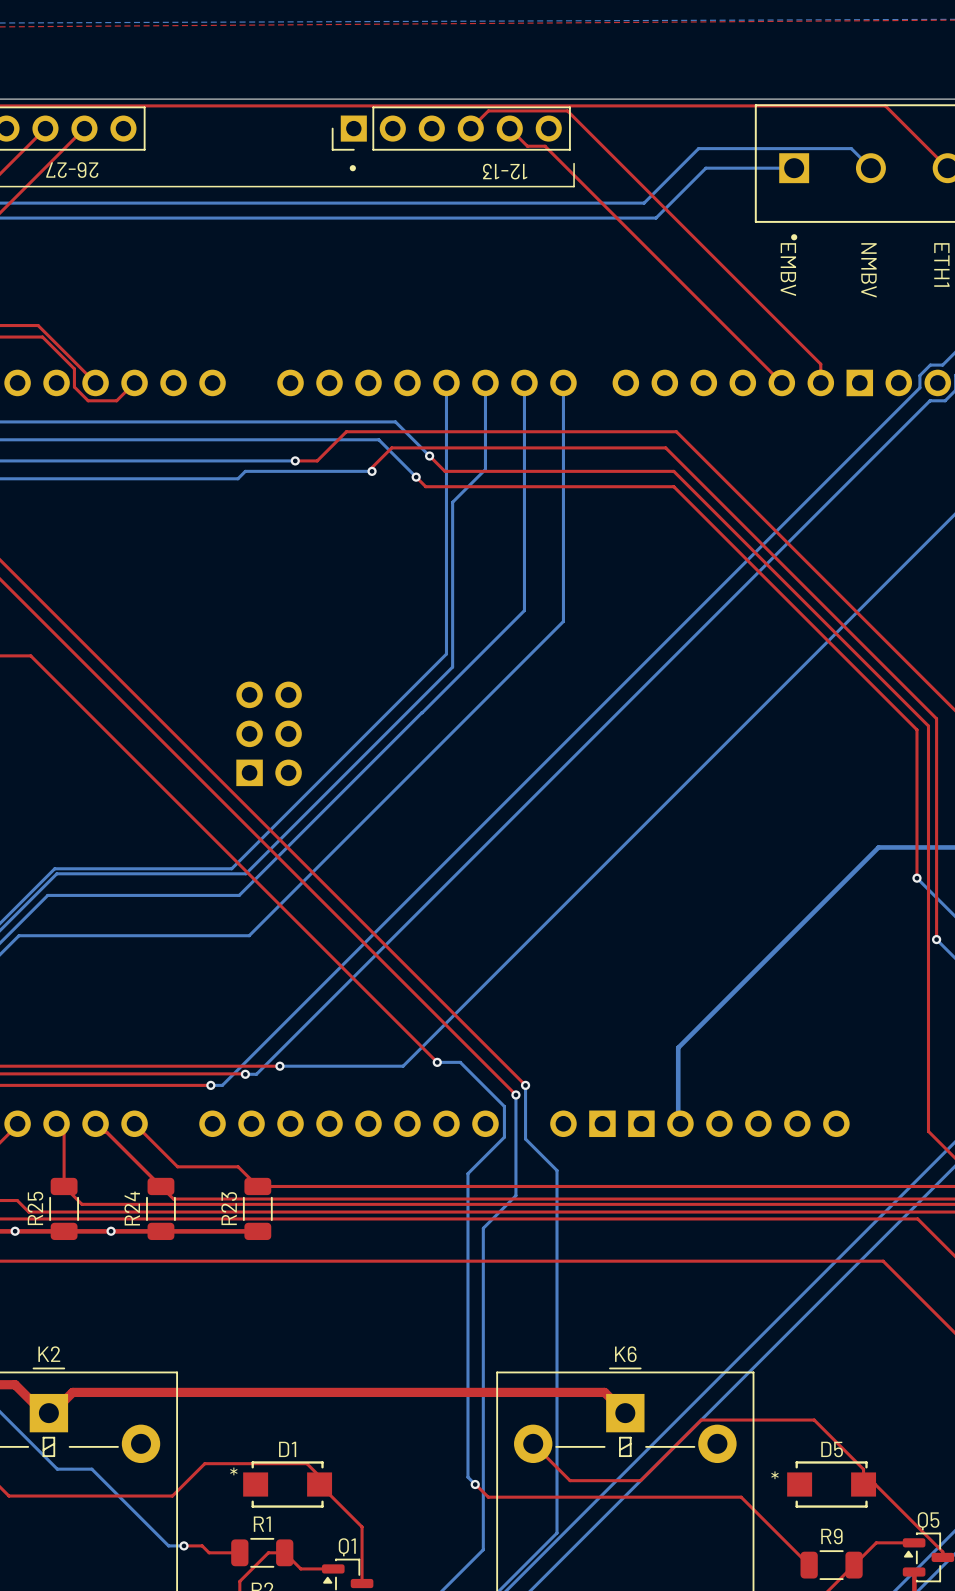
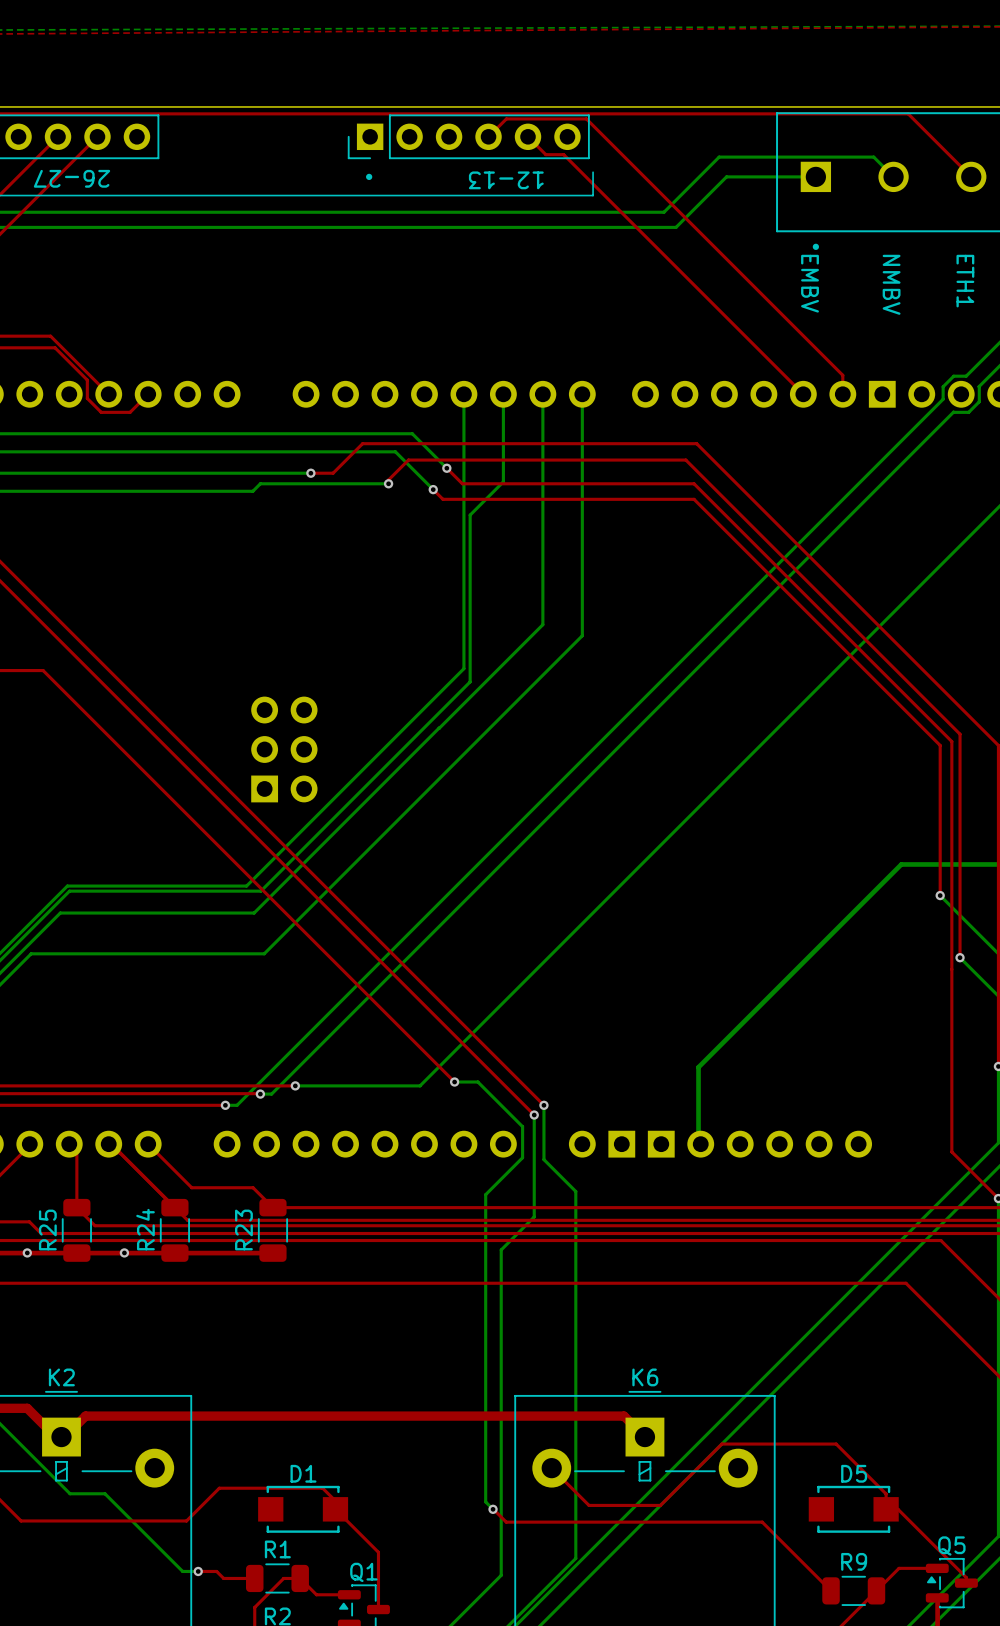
text: * (233, 1471) -> none
text: * (774, 1475) -> none

